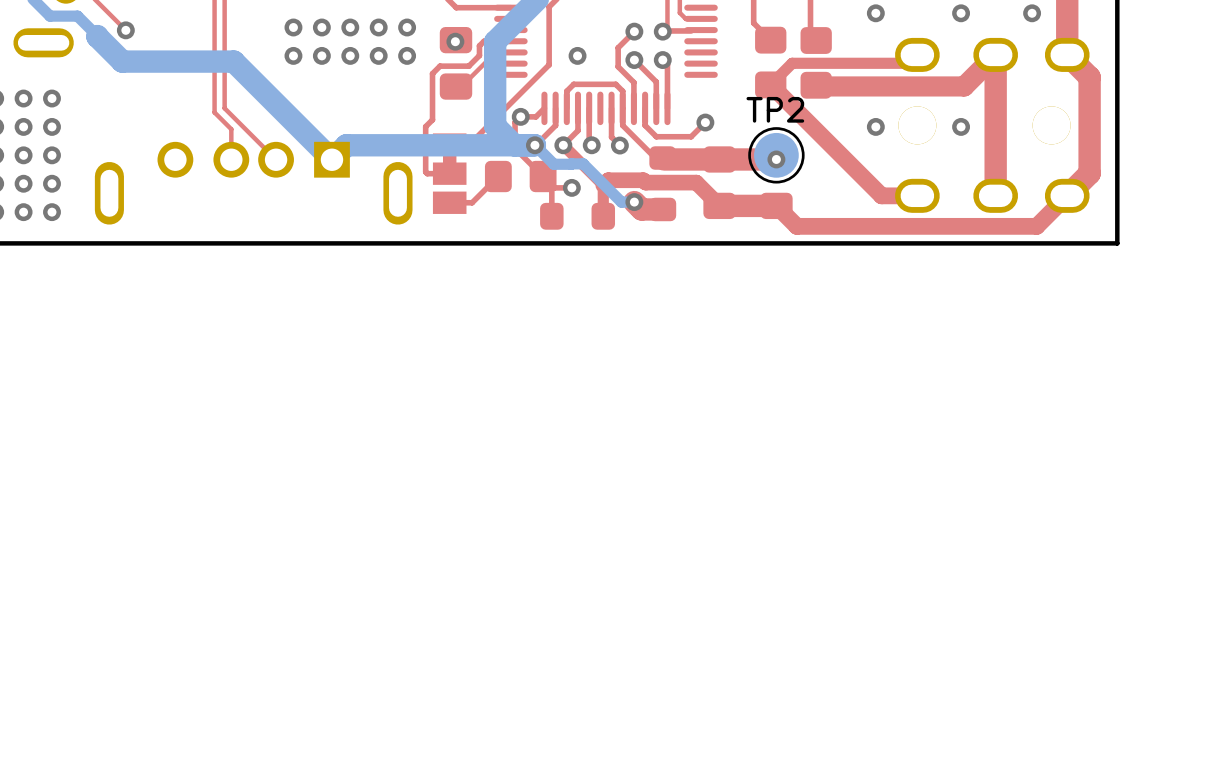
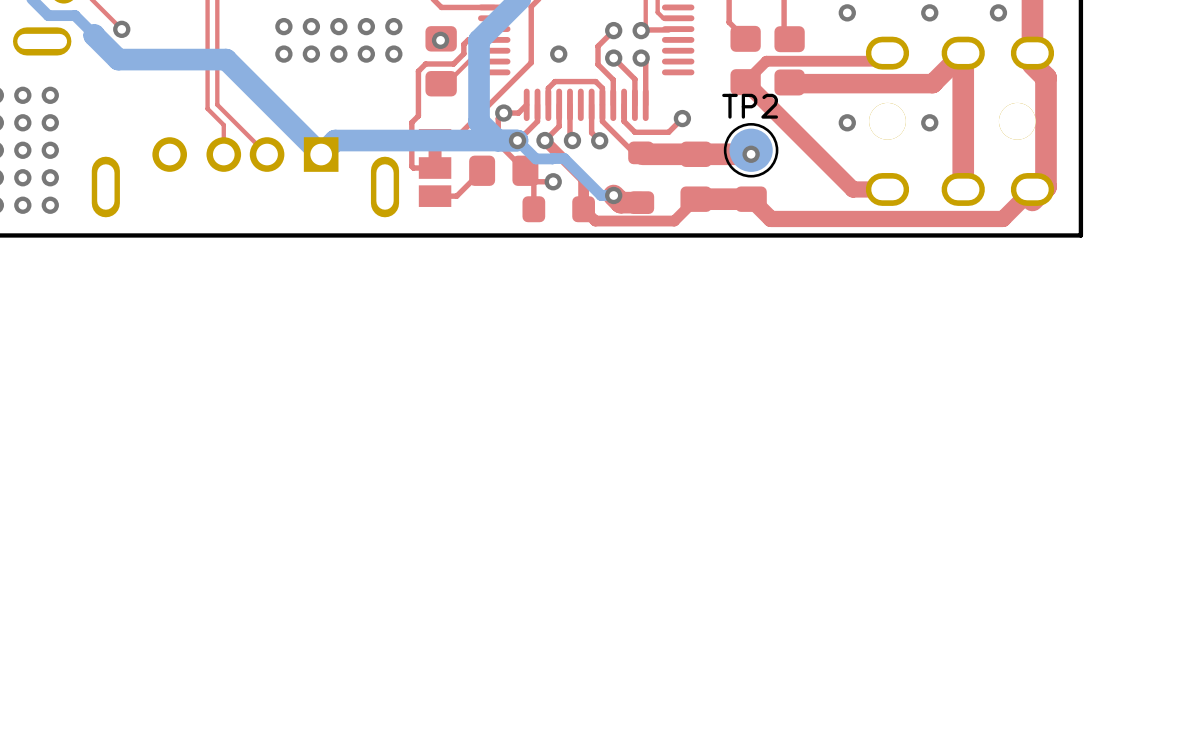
top track: (1067, 54) (1089, 77) (1089, 173) (1067, 195) -> none
top track: none -> (1032, 64) (1045, 77) (1045, 186) (1032, 200)
top track: (603, 185) (608, 180) (696, 182) (719, 205) -> (583, 209) (595, 221) (674, 221) (696, 199)

